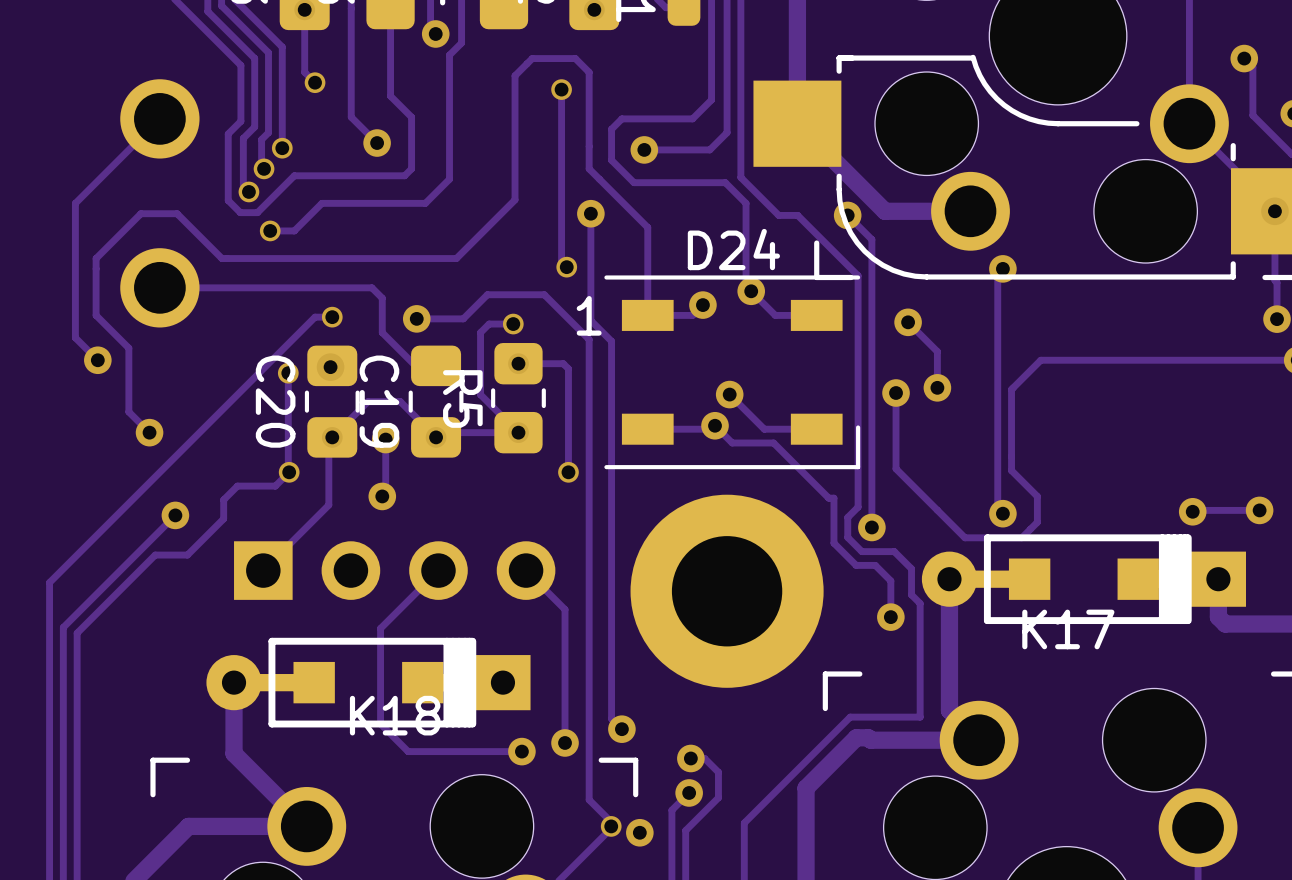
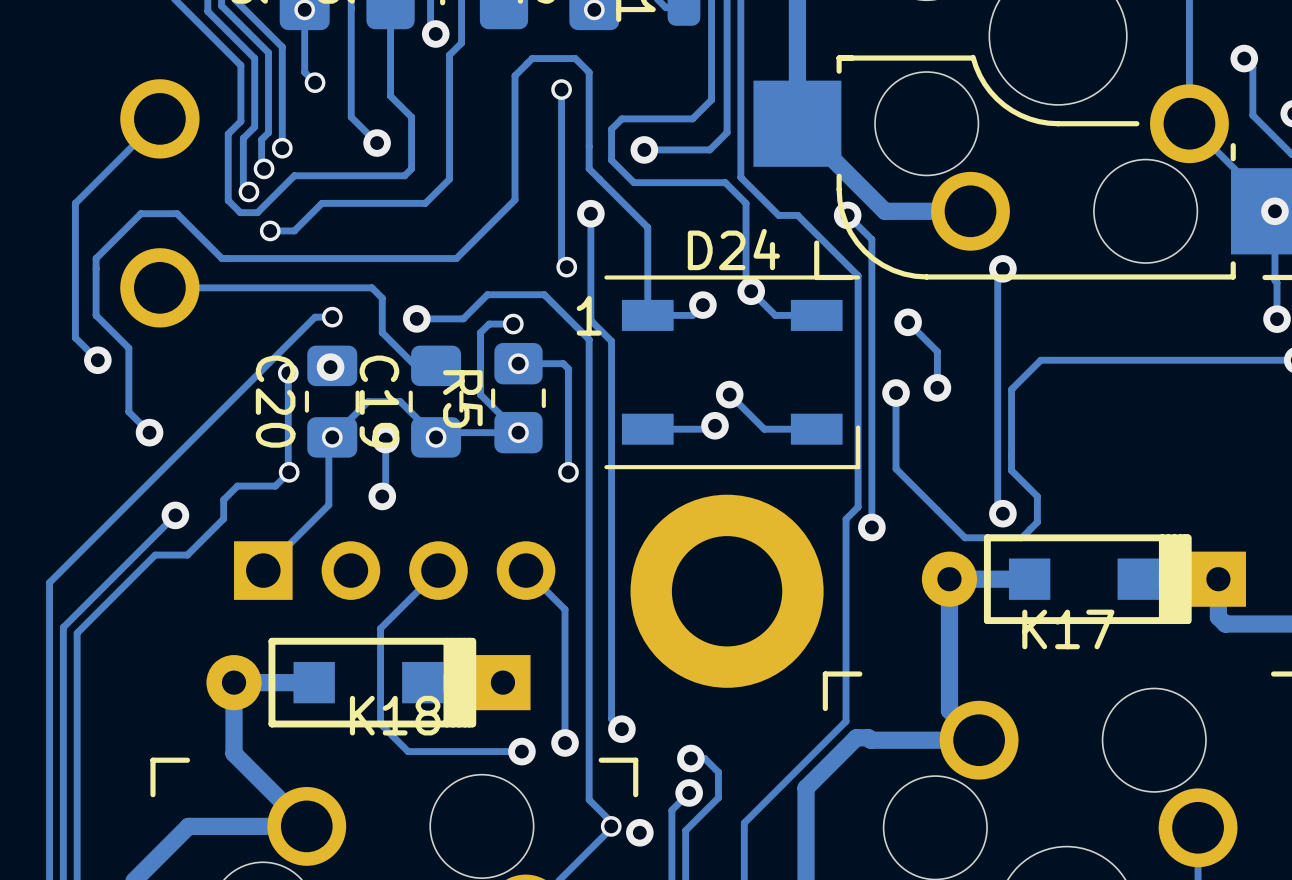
track: (715, 425) (732, 443) (773, 443) (828, 498) (833, 498) (833, 543) (856, 565) (875, 565) (890, 580) (890, 617) -> none
track: (1259, 510) (1192, 511) -> none
via: (1259, 510) -> none
via: (1192, 511) -> none
track: (847, 517) (847, 537) (861, 551) (894, 551) (911, 568) (911, 594) (920, 603) (920, 717) (850, 717) (846, 721) -> (847, 517) (846, 519) (846, 721)
via: (890, 617) -> none

